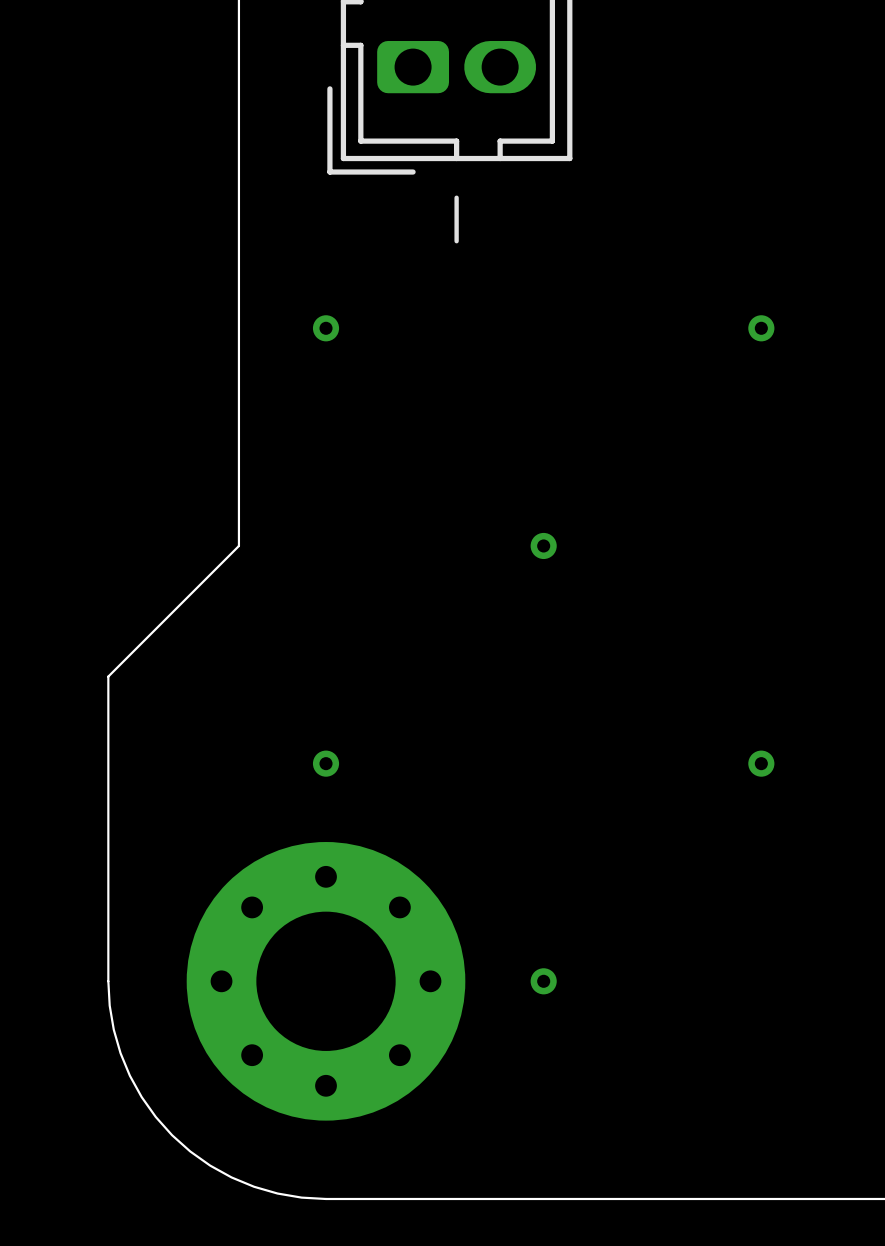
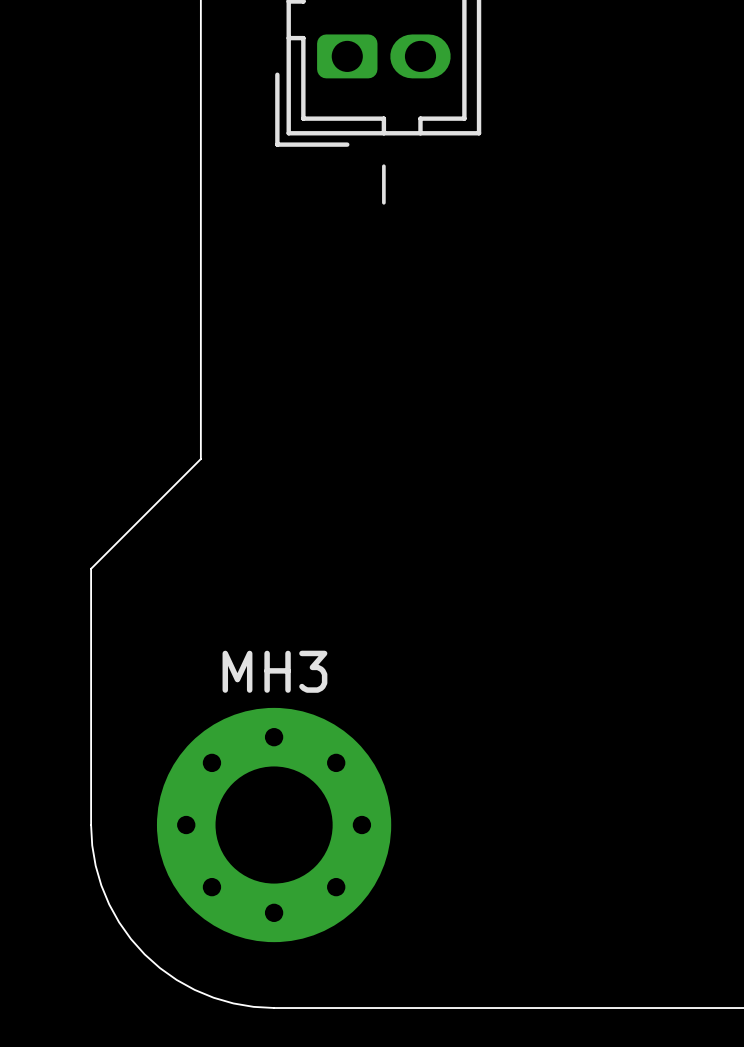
via: (326, 328) -> none
via: (761, 328) -> none
via: (543, 545) -> none
via: (326, 763) -> none
via: (761, 763) -> none
MH3 name: none -> MH3 (274, 671)
via: (543, 981) -> none

